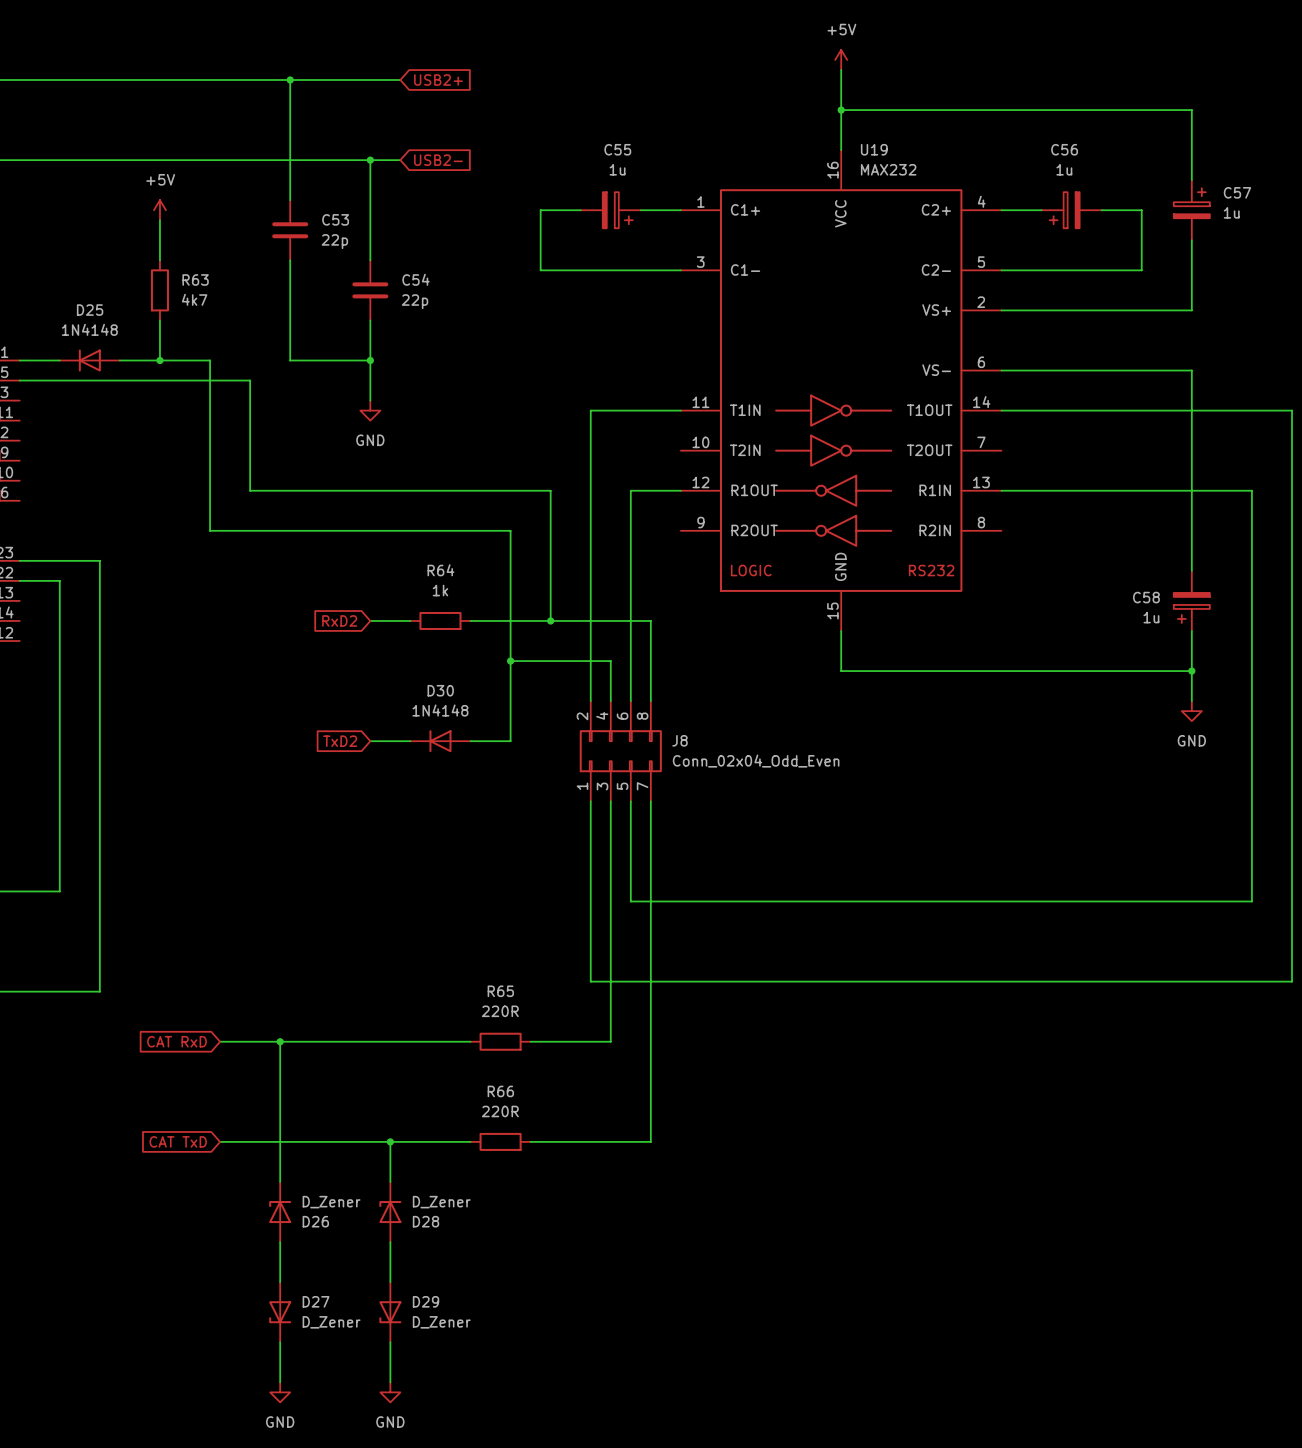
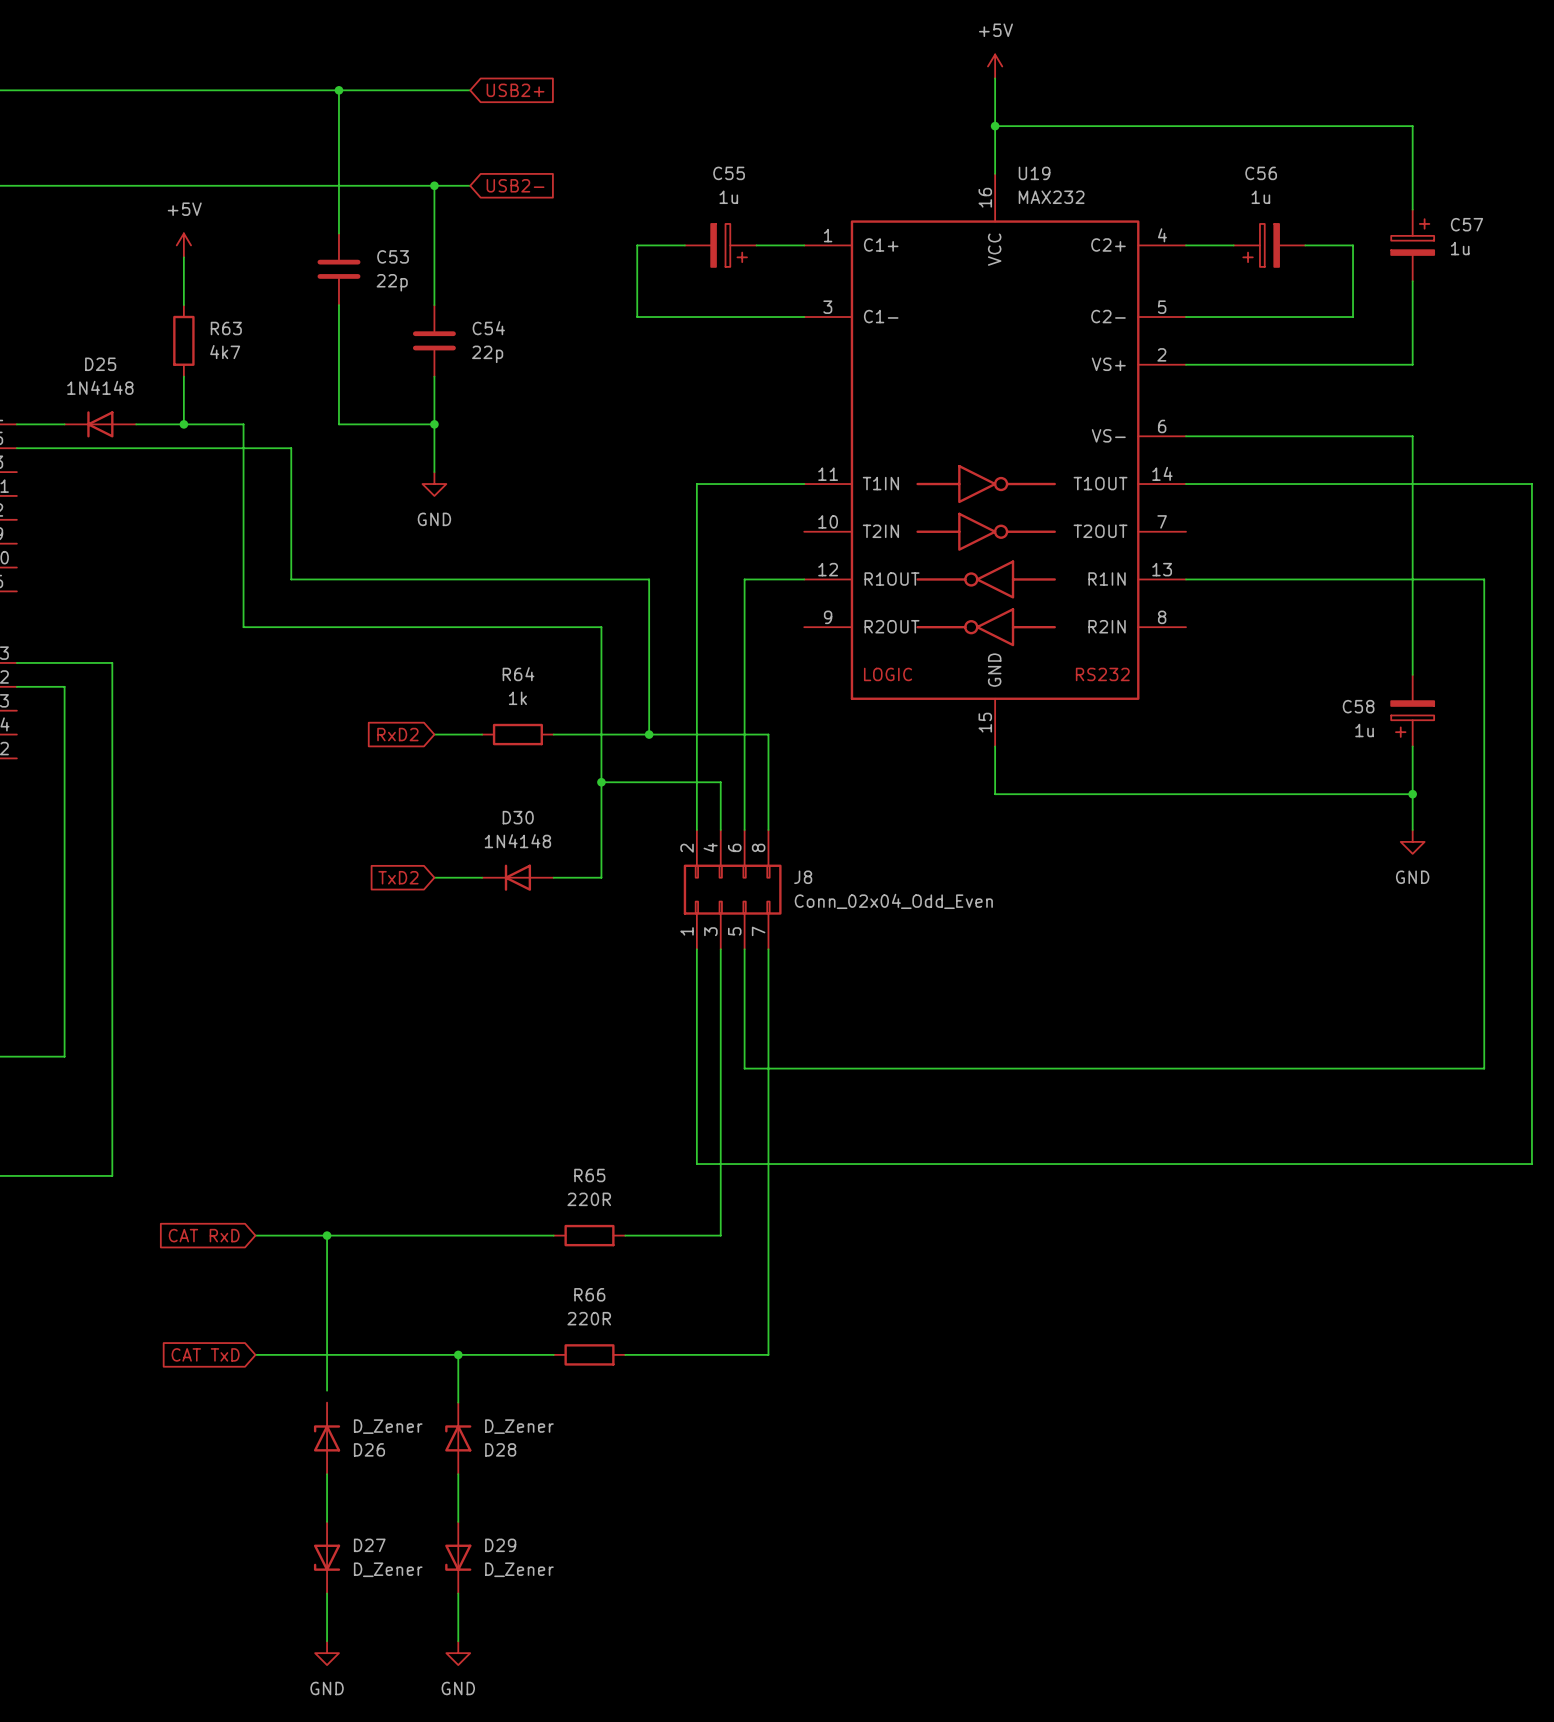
wire: (280, 1171) (280, 1181) -> none

